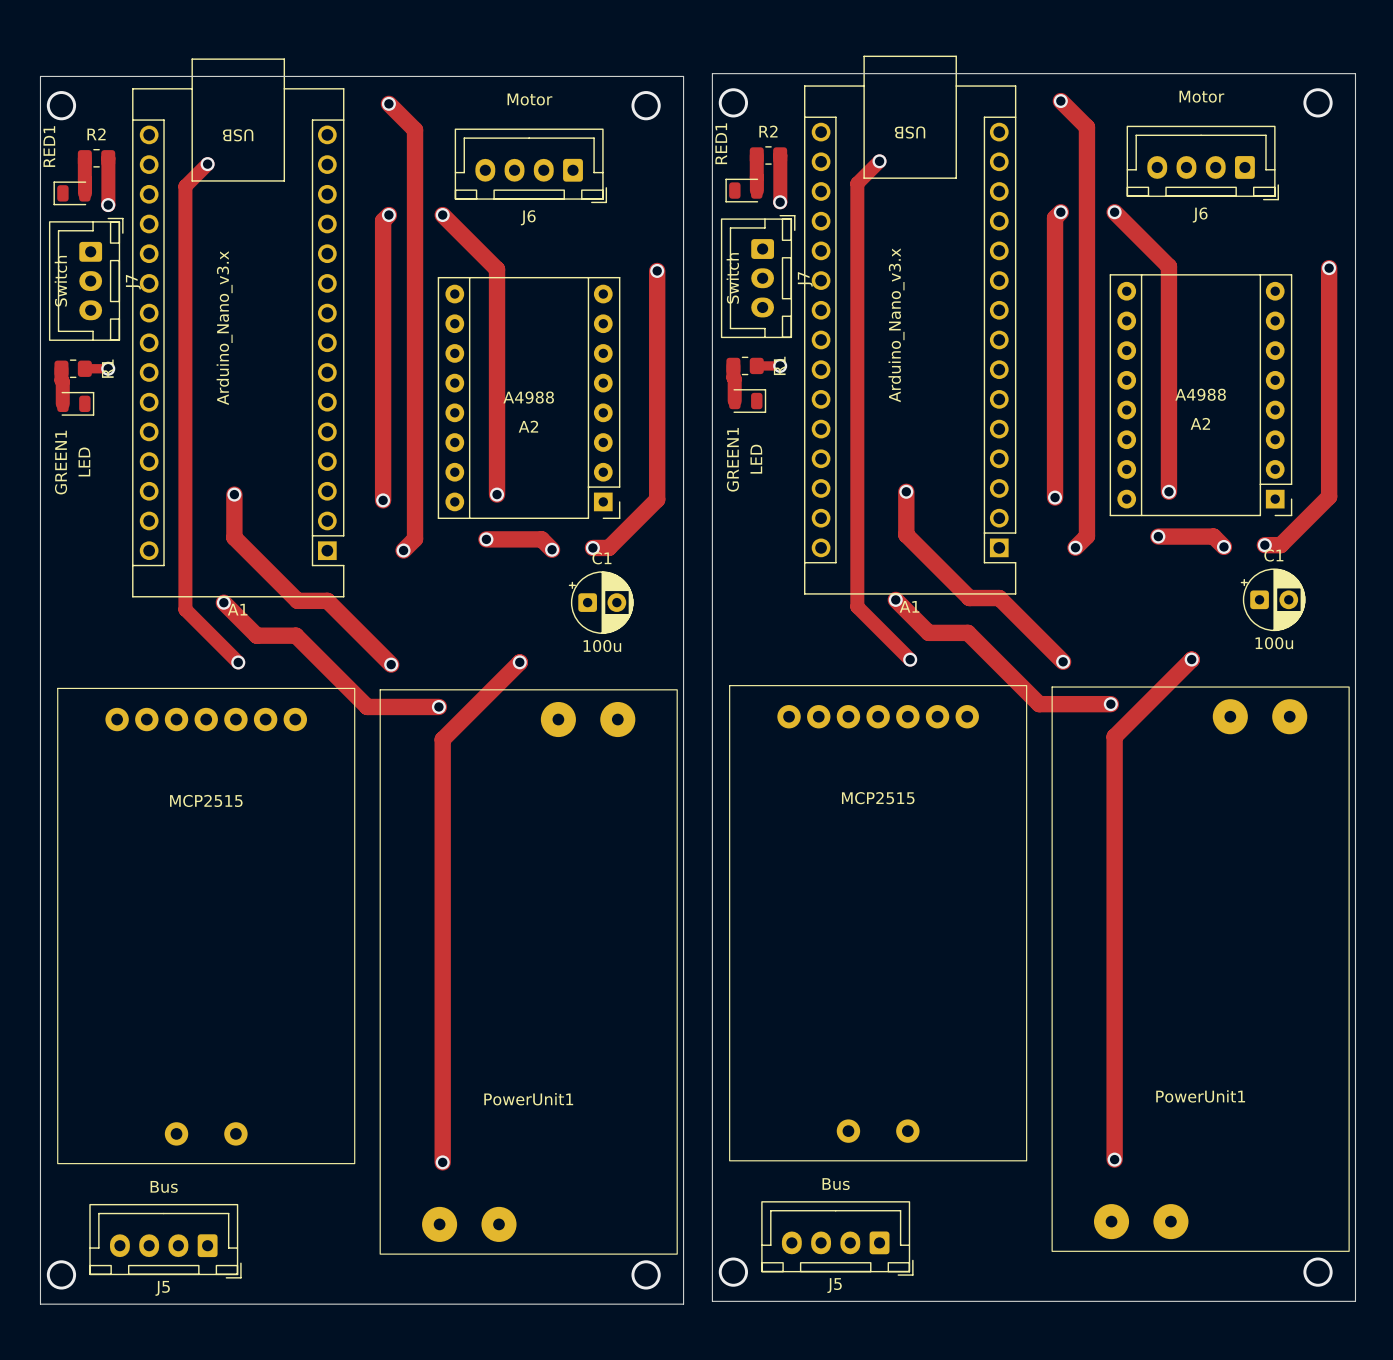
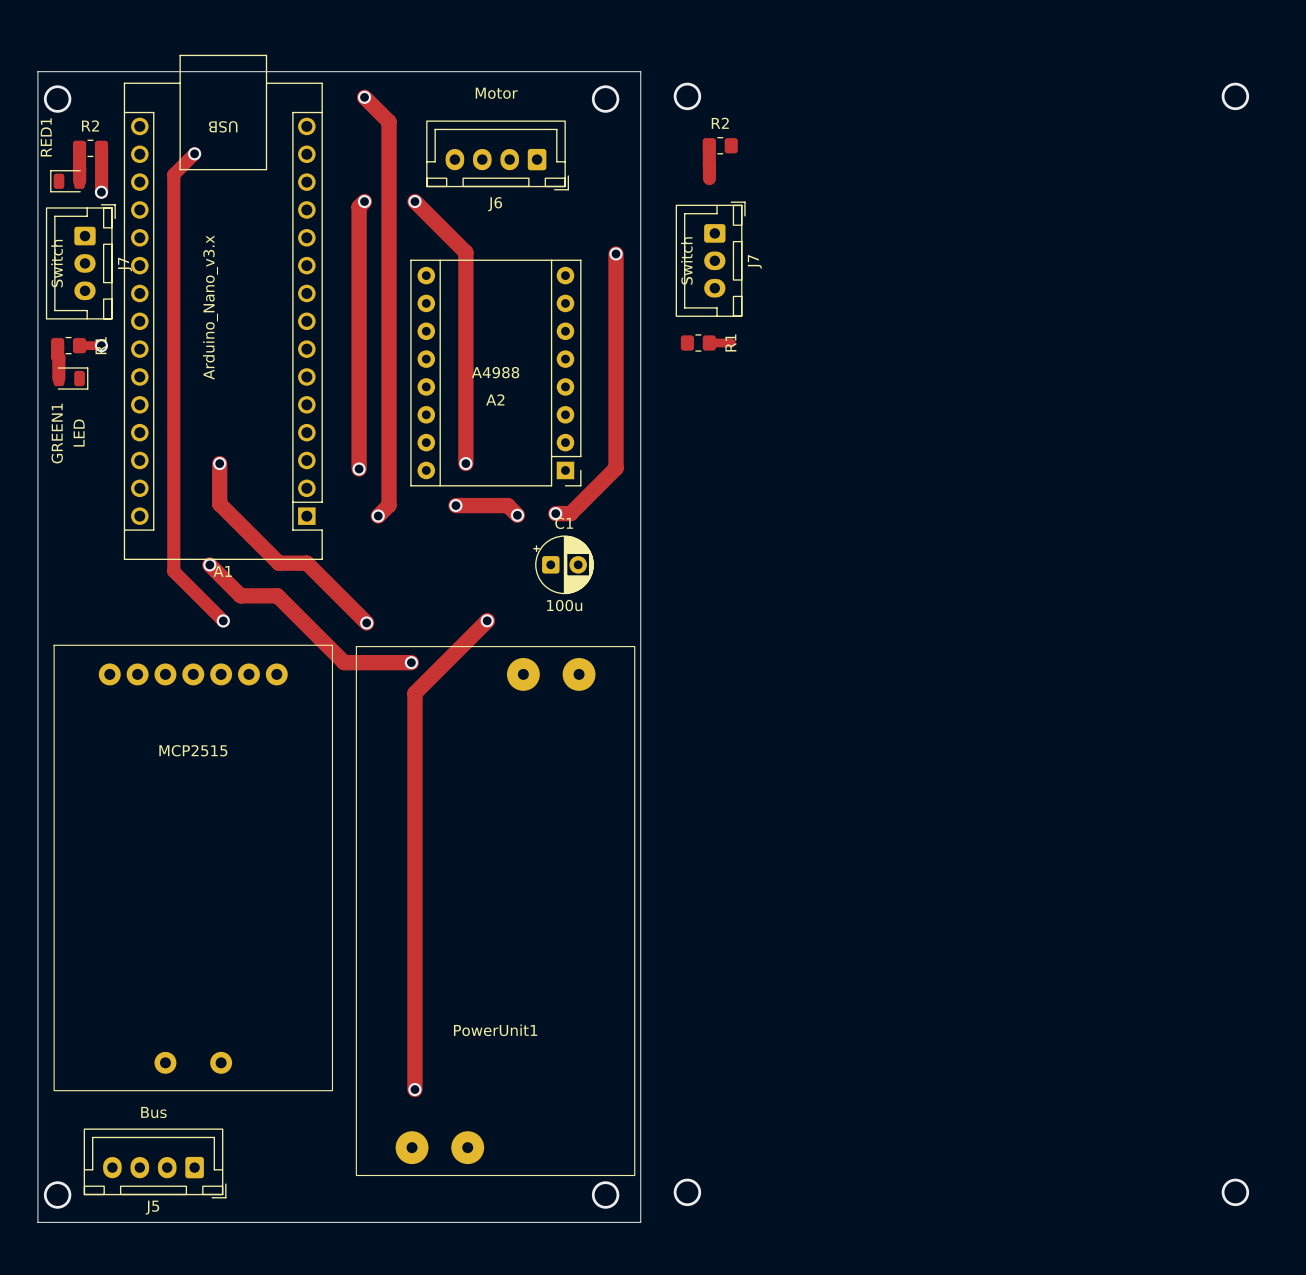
board edge: (712, 73) (1355, 73) (1355, 1301) (712, 1301) (712, 73) -> none
track: (1060, 101) (1086, 127) (1086, 536) (1075, 547) -> none
via: (1060, 101) -> none
track: (780, 155) (780, 202) -> none
track: (879, 161) (857, 183) (857, 606) (910, 659) -> none
via: (879, 161) -> none
J6: Motor (1202, 163) -> none
RED1: (743, 190) -> none
via: (780, 202) -> none
track: (1060, 212) (1055, 218) (1055, 497) -> none
via: (1060, 212) -> none
track: (1114, 212) (1168, 266) (1168, 491) -> none
via: (1114, 212) -> none
track: (1329, 268) (1329, 496) (1280, 545) (1264, 545) -> none
via: (1329, 268) -> none
A1: Arduino_Nano_v3.x (910, 325) -> none
track: (733, 365) (734, 401) -> none
via: (780, 365) -> none
A2: A4988 (1200, 395) -> none
GREEN1: LED (747, 401) -> none
track: (906, 491) (906, 534) (969, 598) (999, 598) (1063, 661) -> none
via: (906, 491) -> none
via: (1168, 491) -> none
via: (1055, 497) -> none
track: (1158, 536) (1213, 536) (1223, 546) -> none
via: (1158, 536) -> none
via: (1264, 545) -> none
via: (1223, 546) -> none
via: (1075, 547) -> none
track: (895, 599) (928, 632) (967, 632) (1039, 704) (1110, 704) -> none
via: (895, 599) -> none
C1: 100u (1273, 599) -> none
via: (910, 659) -> none
track: (1191, 659) (1114, 736) (1114, 1159) -> none
via: (1191, 659) -> none
via: (1063, 661) -> none
via: (1110, 704) -> none
MCP2515: (878, 923) -> none
PowerUnit1: (1200, 969) -> none
via: (1114, 1159) -> none
J5: Bus (837, 1238) -> none

